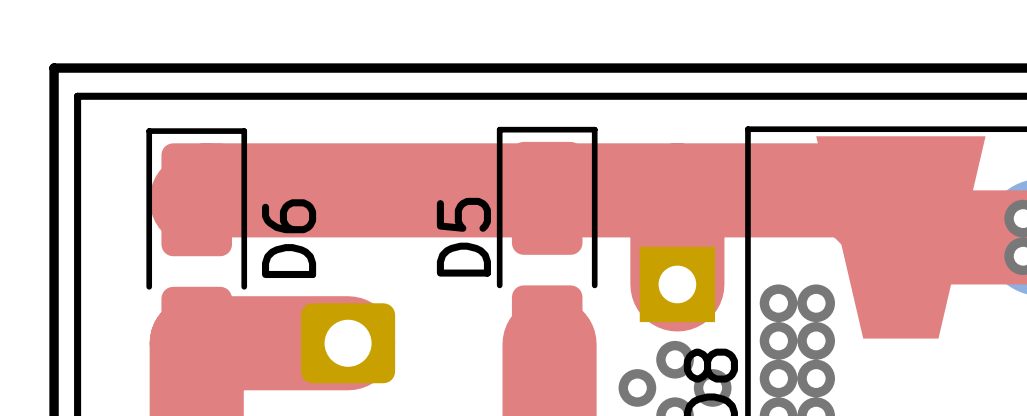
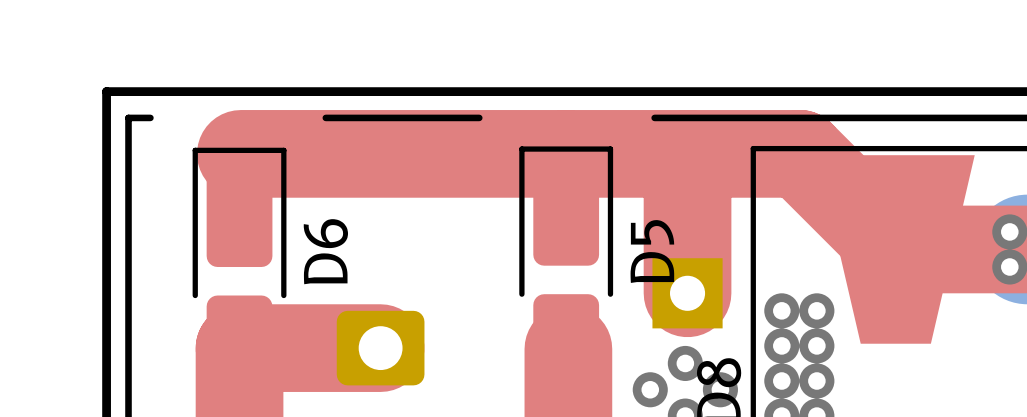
line: (101, 96) (289, 96) -> none
line: (453, 96) (642, 96) -> none
top track: (853, 190) (206, 190) (196, 199) -> (851, 205) (800, 153) (240, 153)
D5 name position: D5 (463, 237) -> D5 (652, 251)

